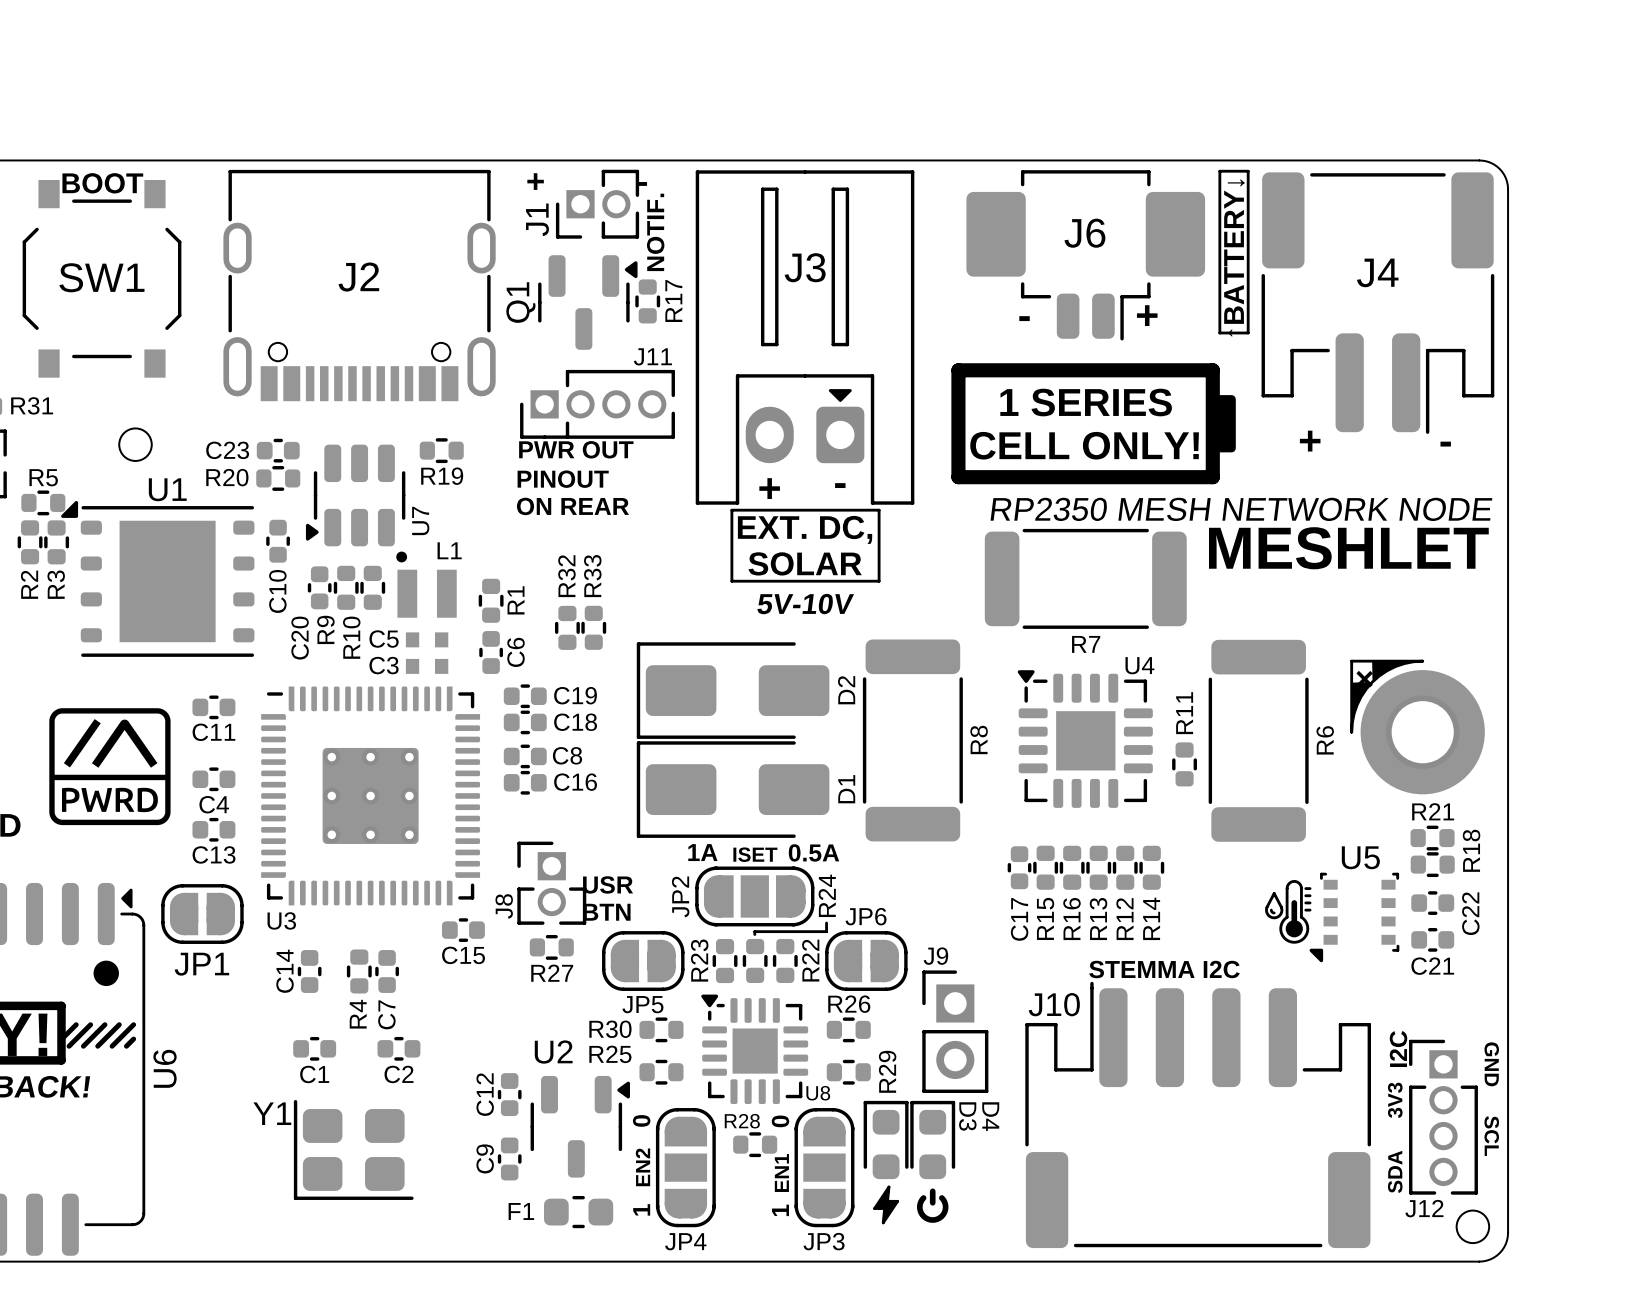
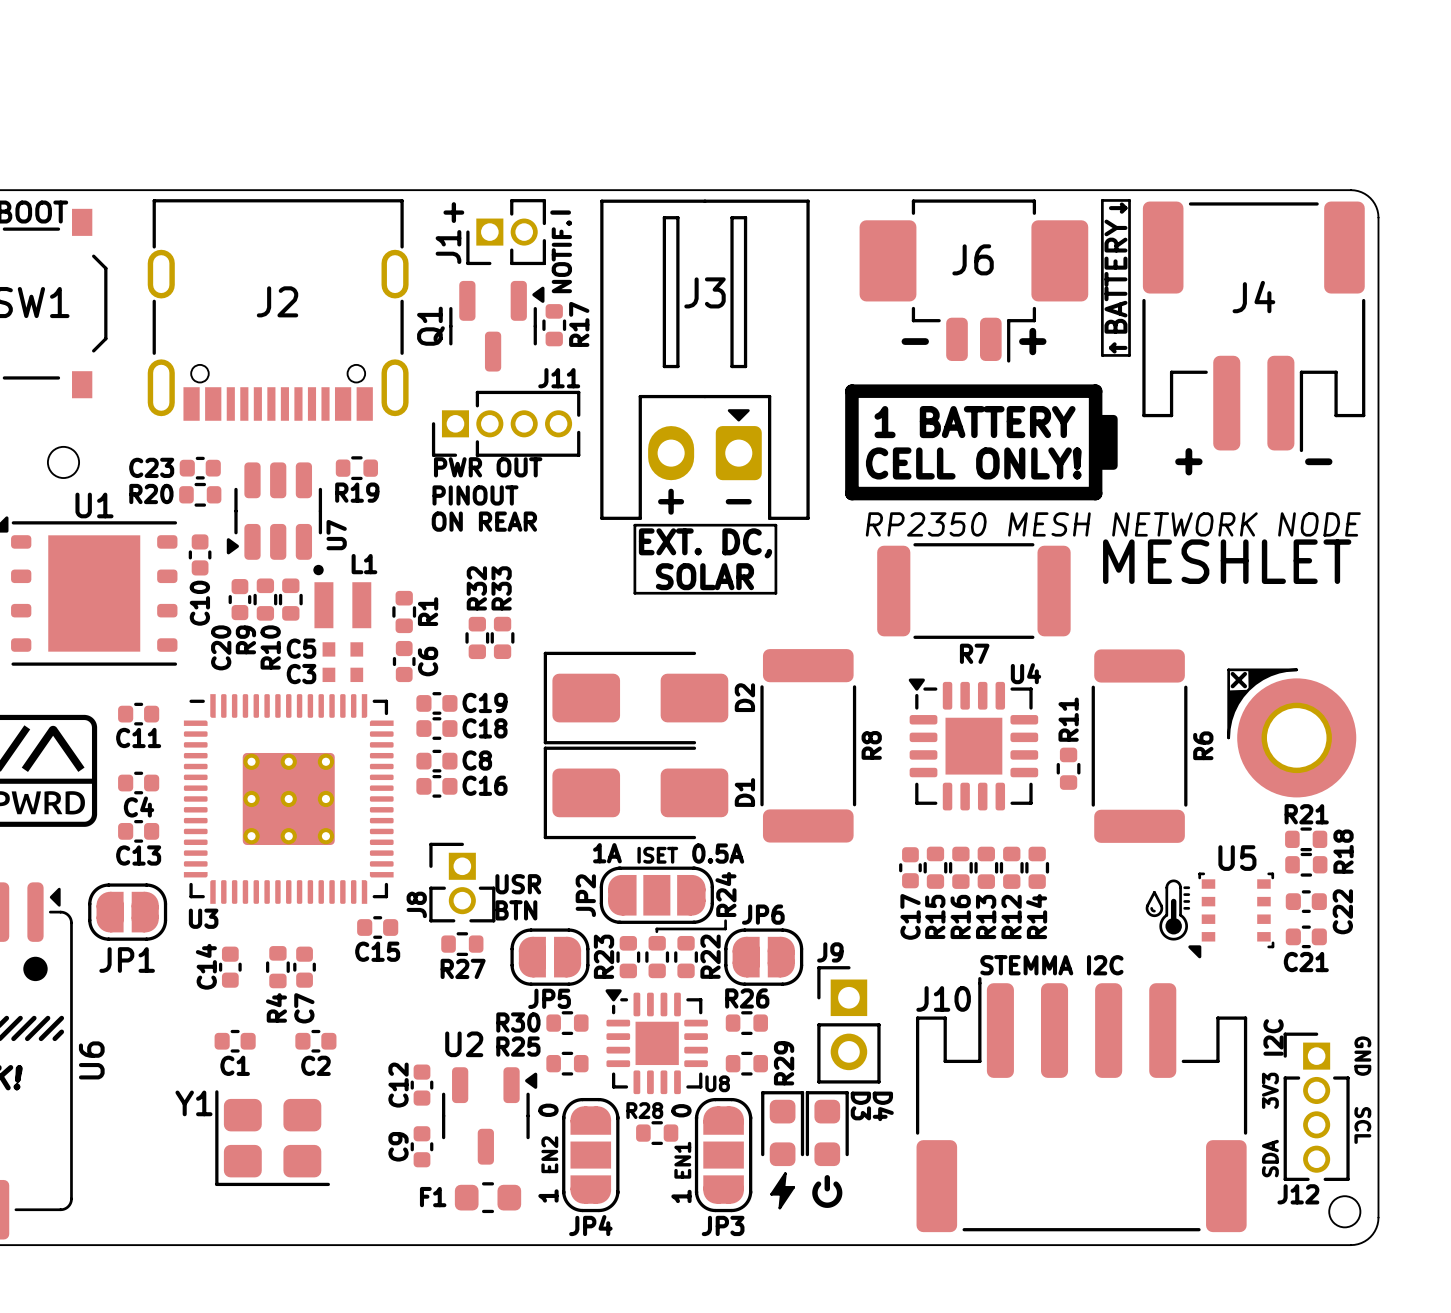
text: 1 SERIES (1086, 402) -> 1 BATTERY (975, 422)
line: (544, 437) (567, 437) -> none
text: 5V-10V (805, 604) -> none

